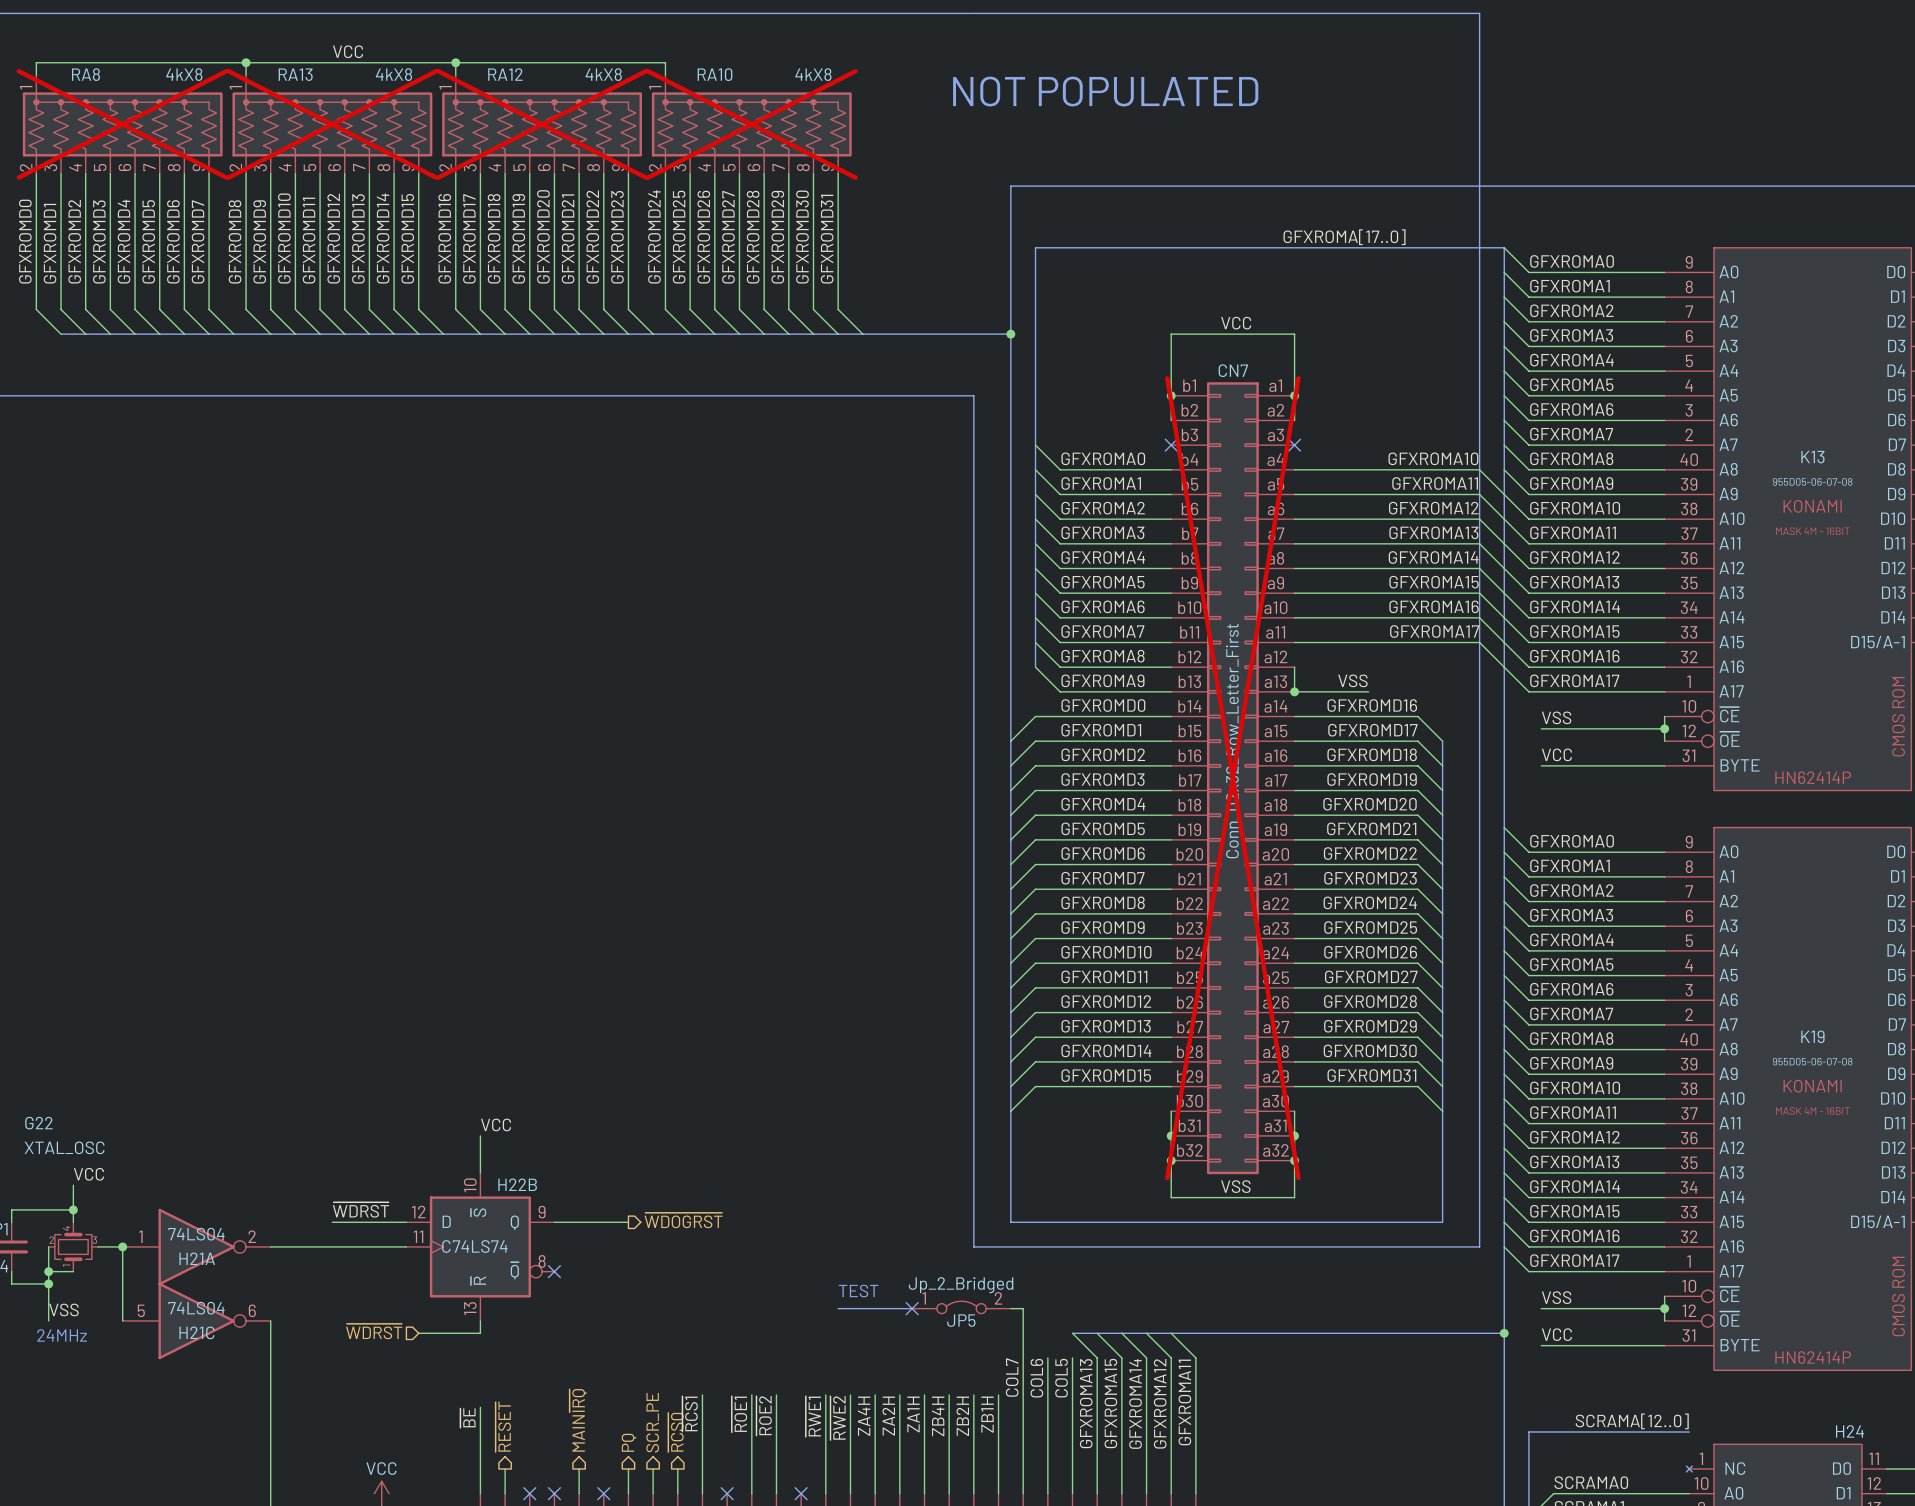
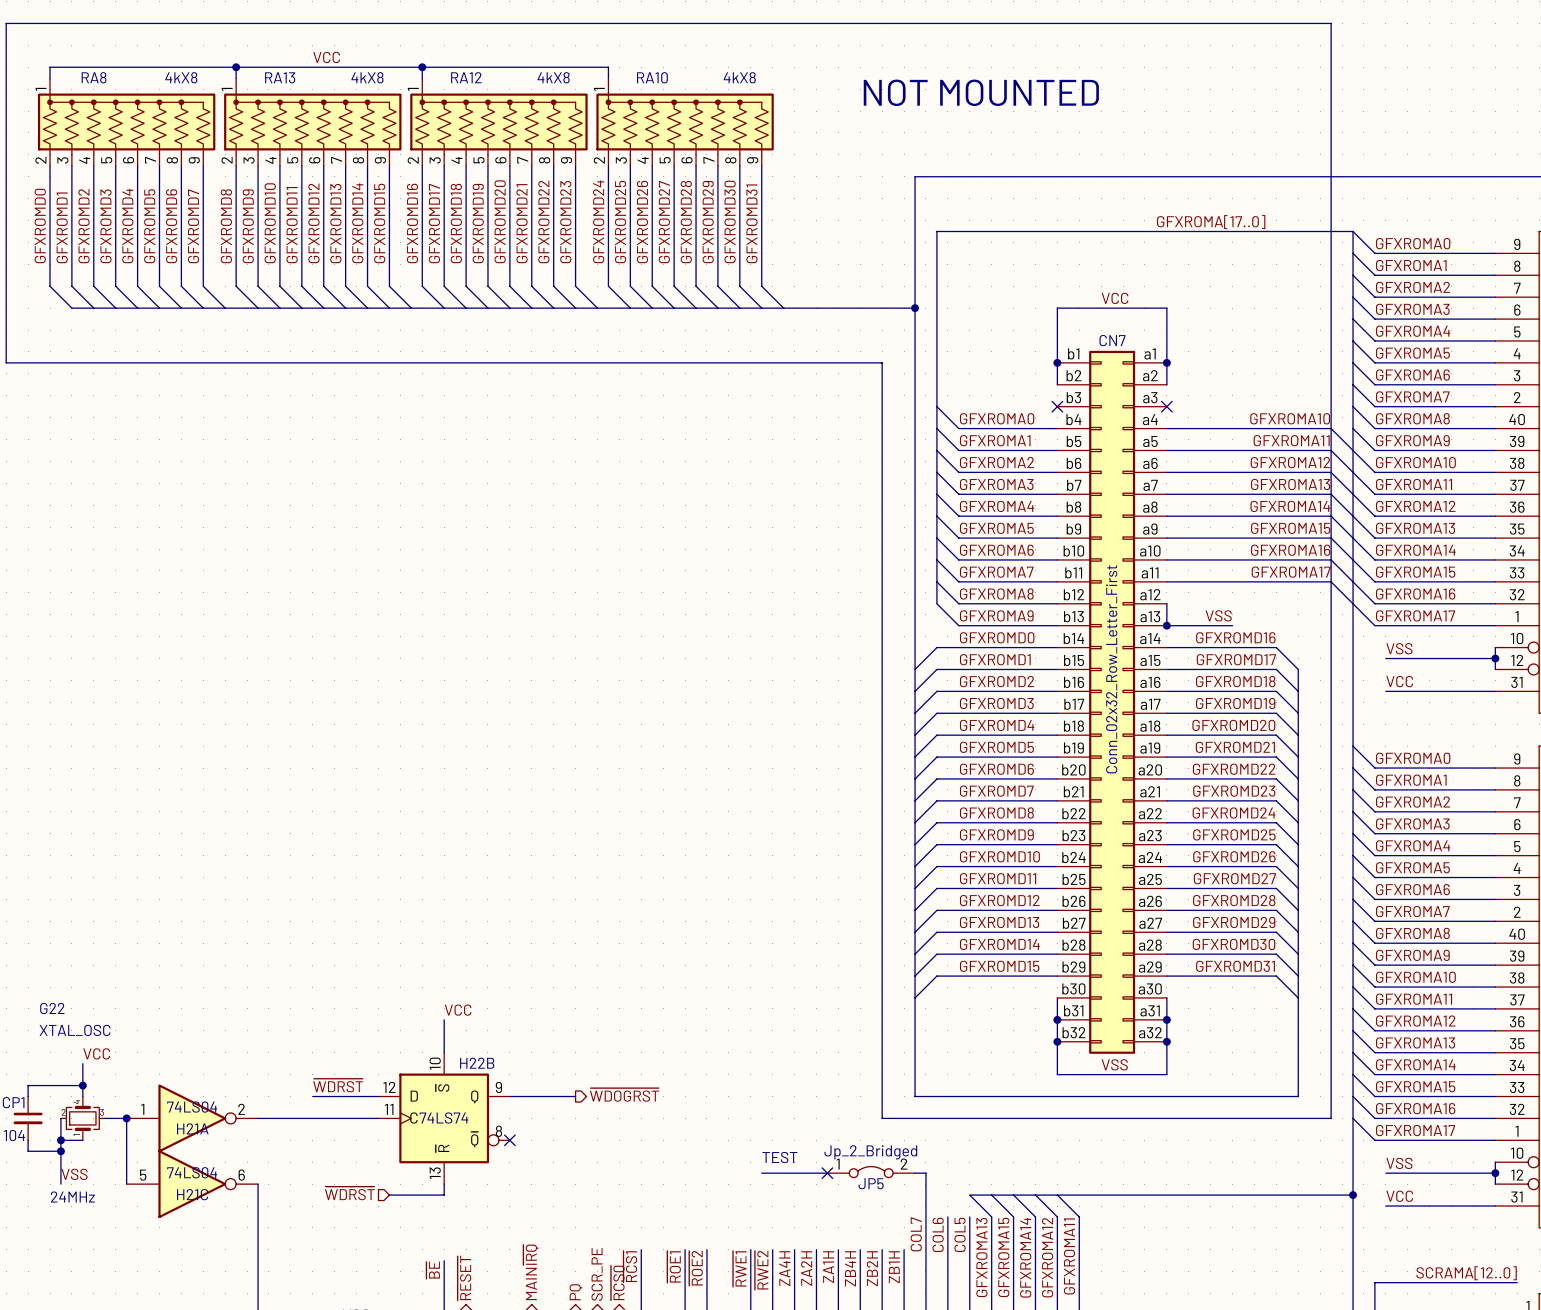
text: NOT POPULATED (1105, 91) -> NOT MOUNTED (981, 92)
RA8 do-not-place cross: (122, 124) -> none
RA13 do-not-place cross: (332, 124) -> none
RA12 do-not-place cross: (542, 124) -> none
RA10 do-not-place cross: (751, 124) -> none
CN7 do-not-place cross: (1232, 778) -> none

